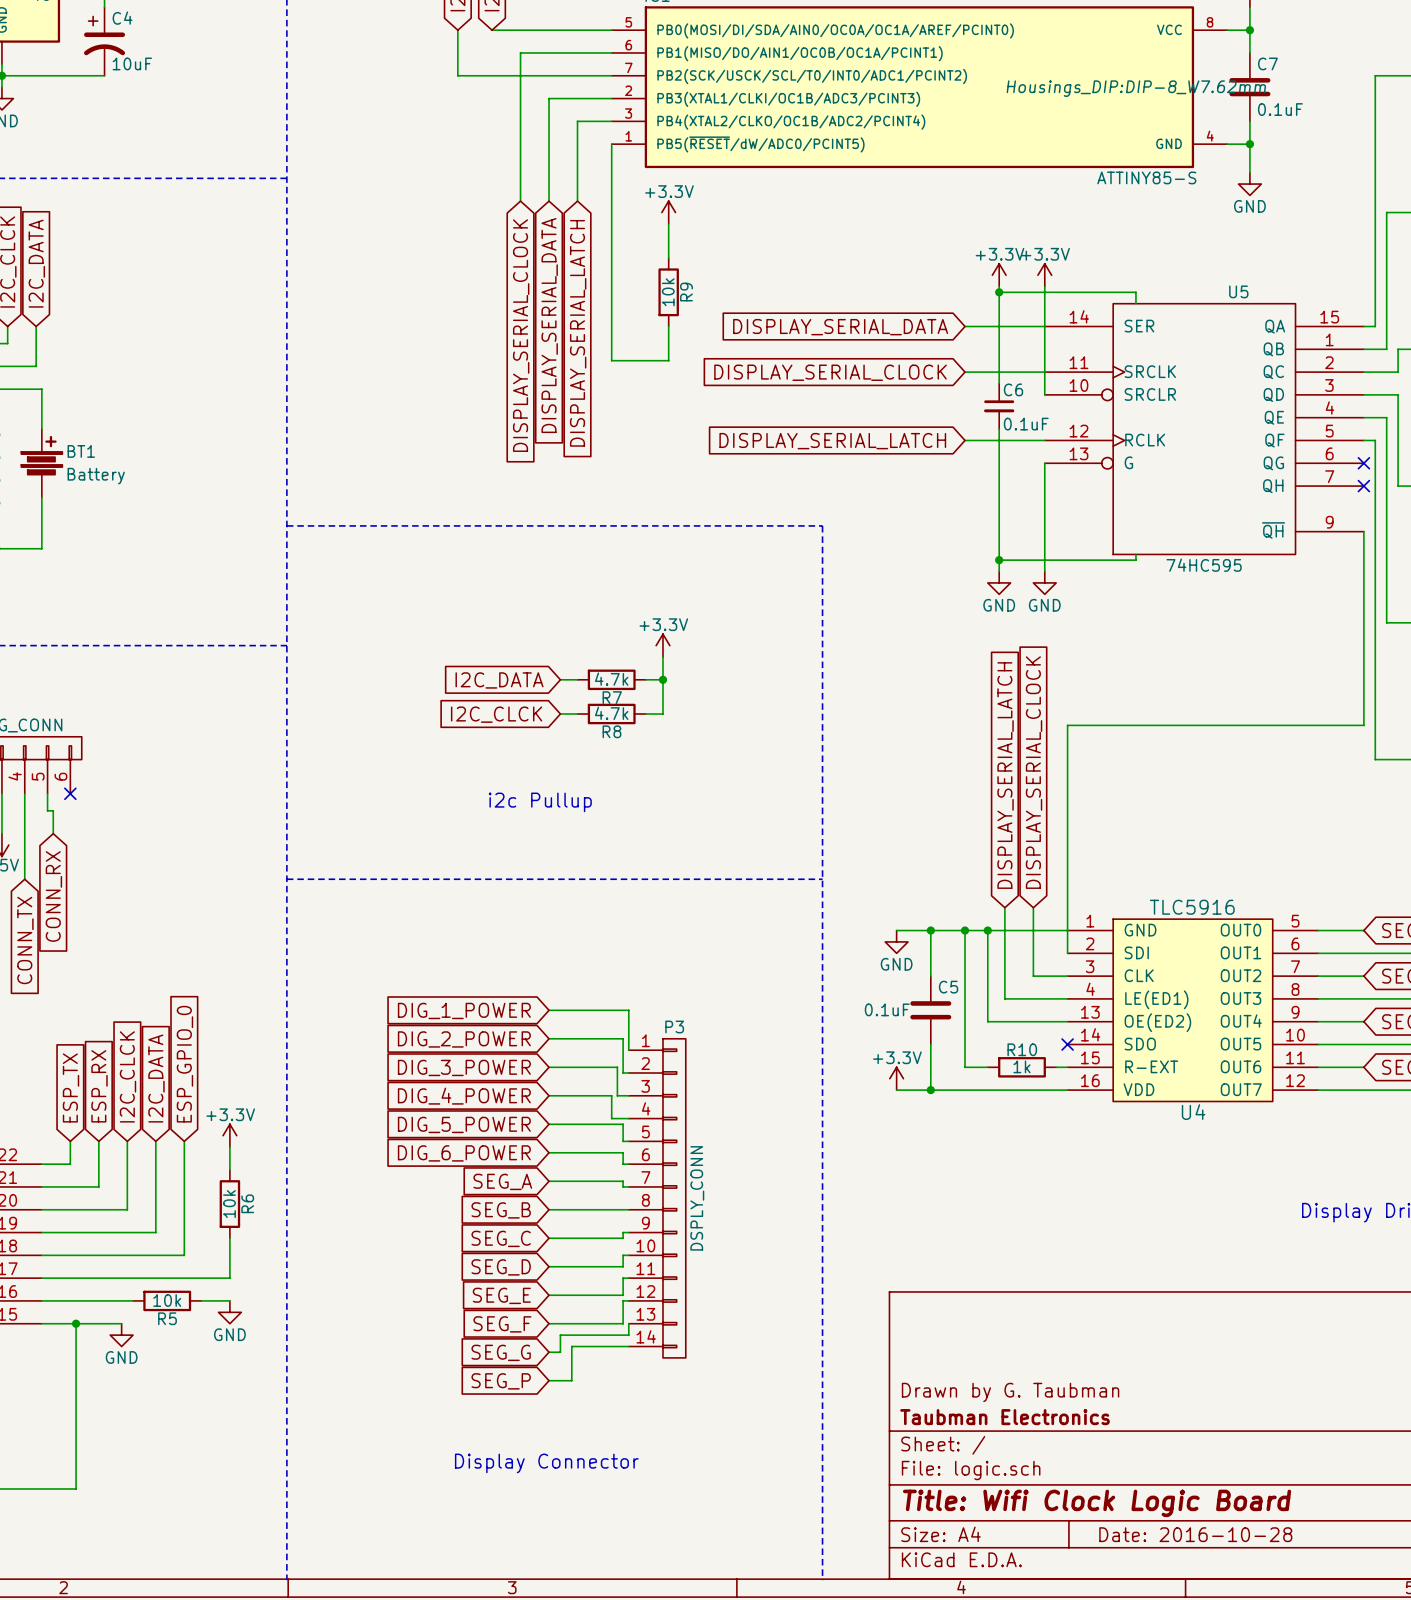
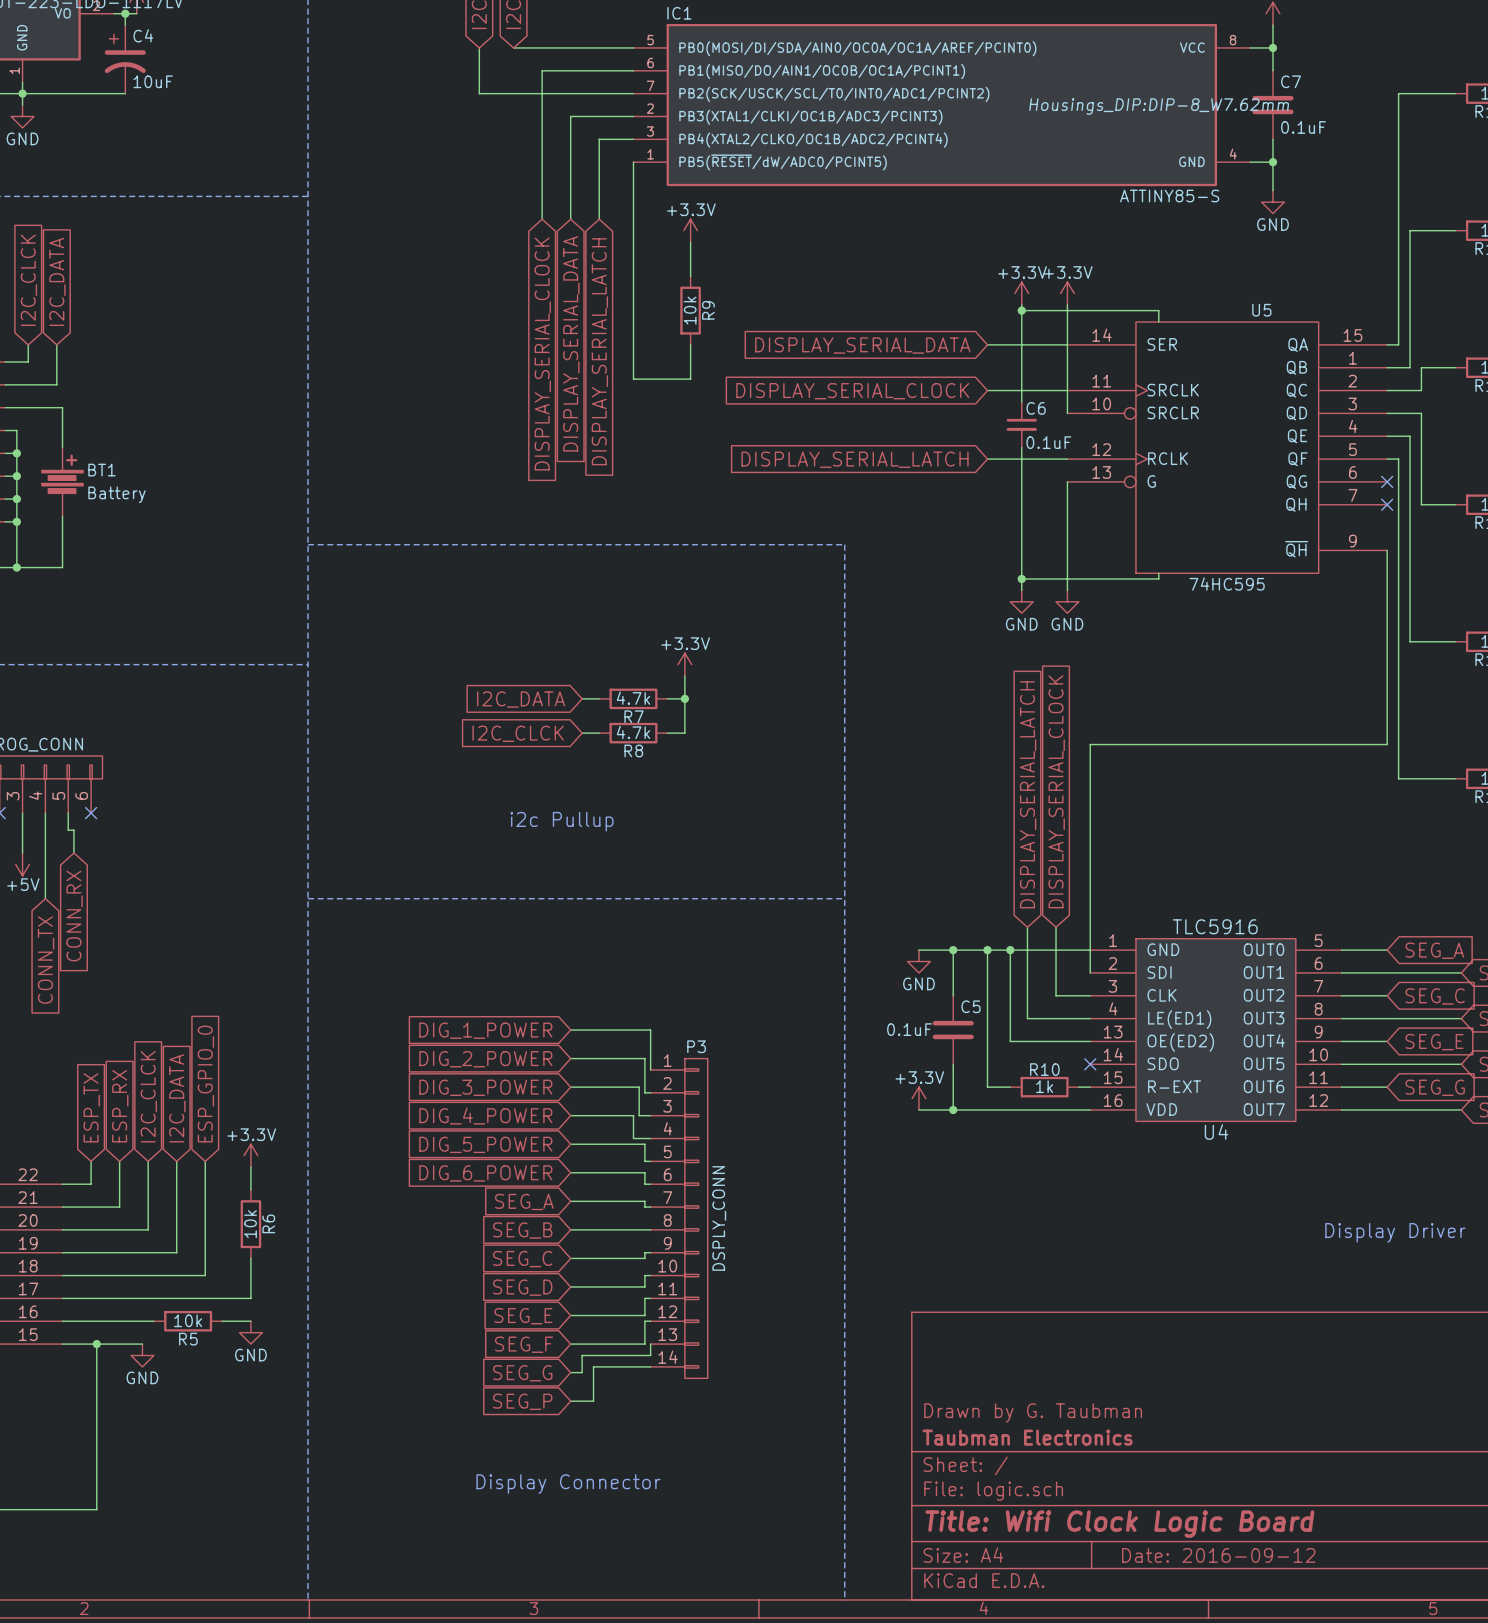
title block: Date: 2016-10-28 (1195, 1534) -> Date: 2016-09-12 (1218, 1555)

